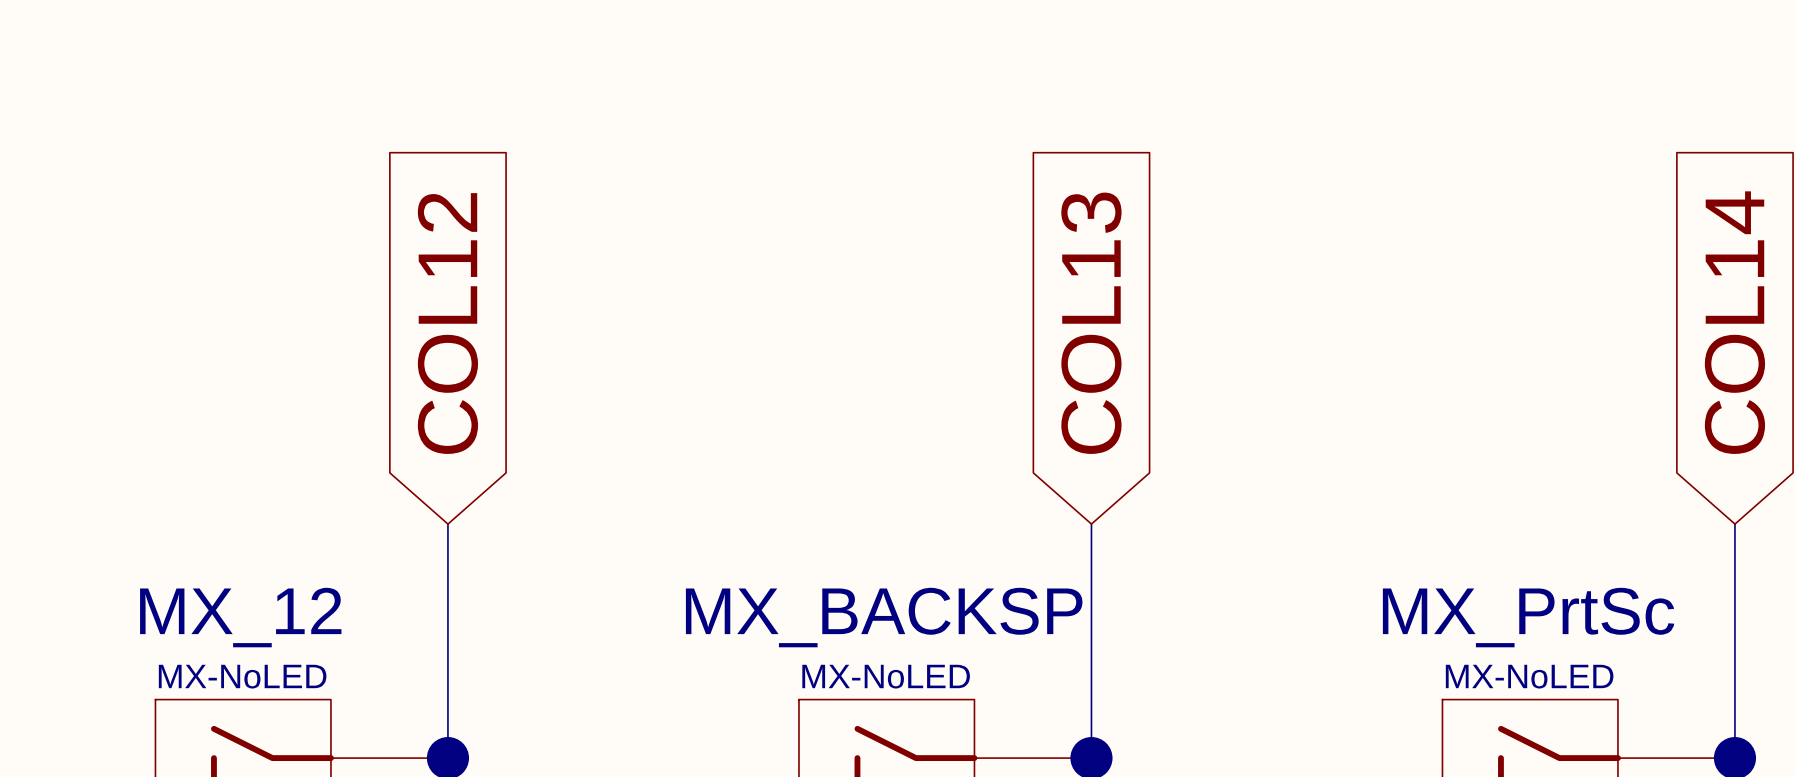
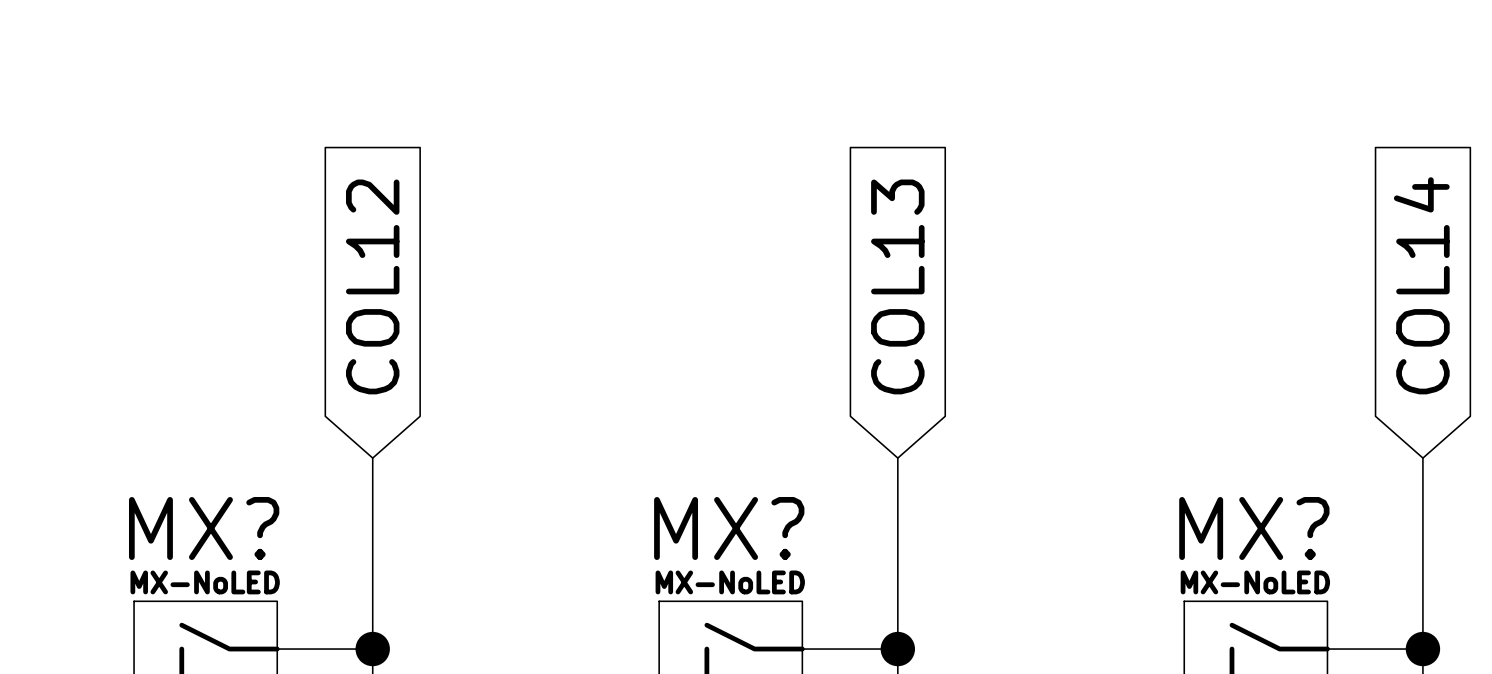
MX_12 name: MX_12 (240, 617) -> MX? (204, 528)
MX_BACKSP name: MX_BACKSP (884, 617) -> MX? (729, 528)
MX_PrtSc name: MX_PrtSc (1528, 617) -> MX? (1254, 528)

